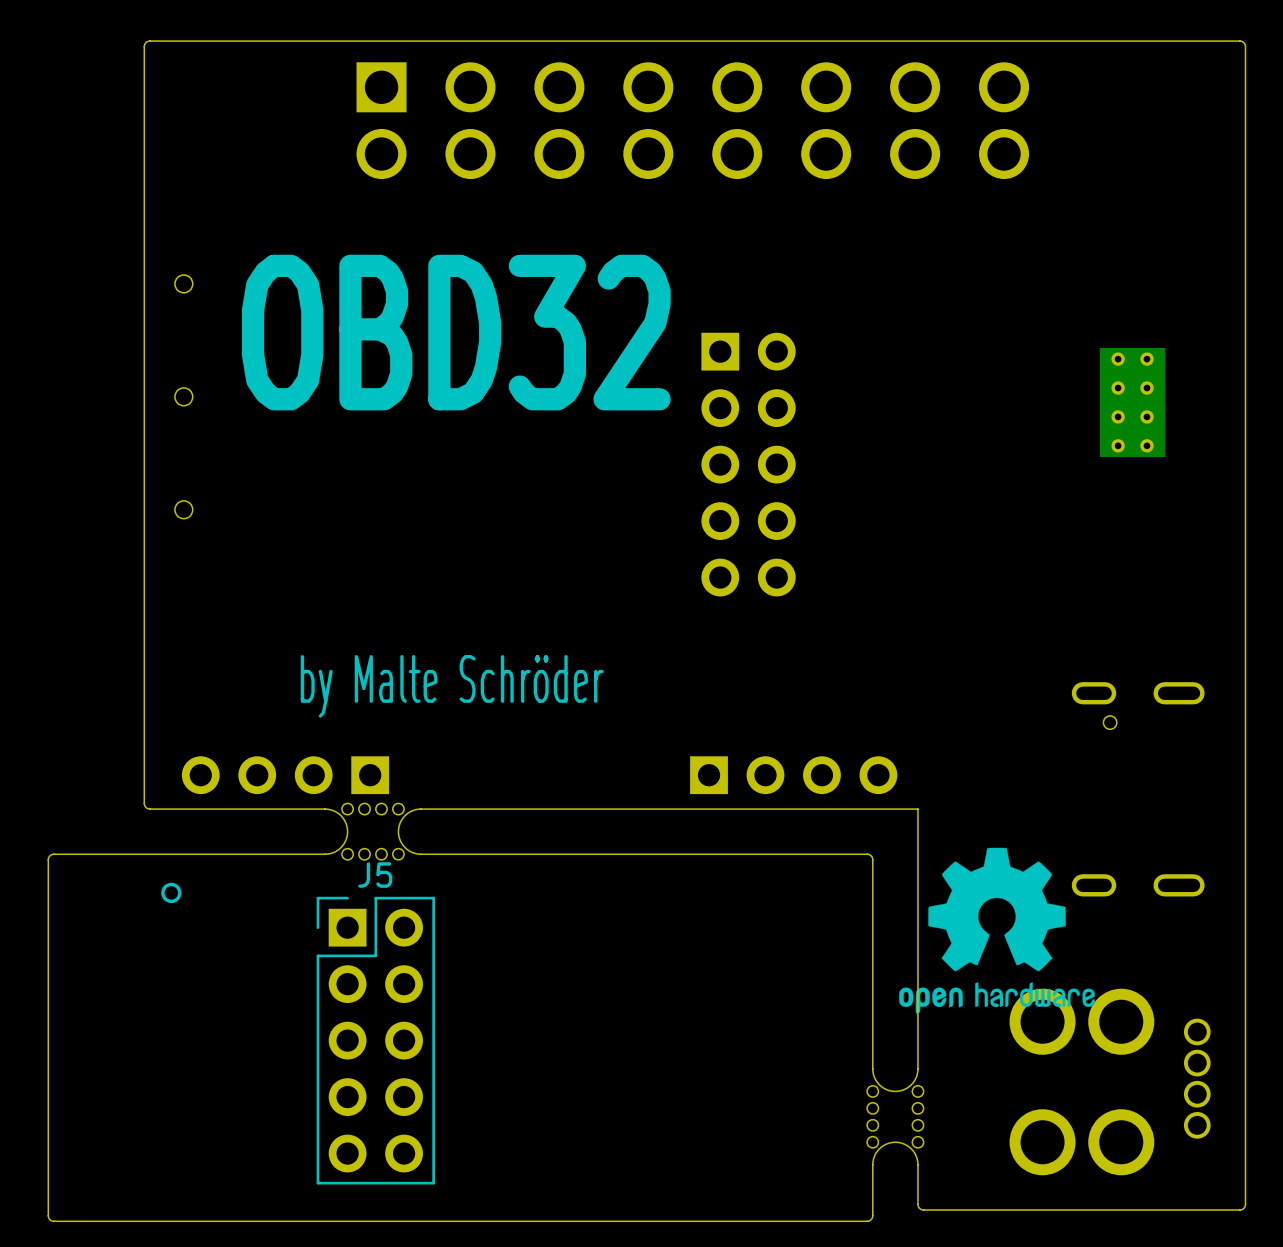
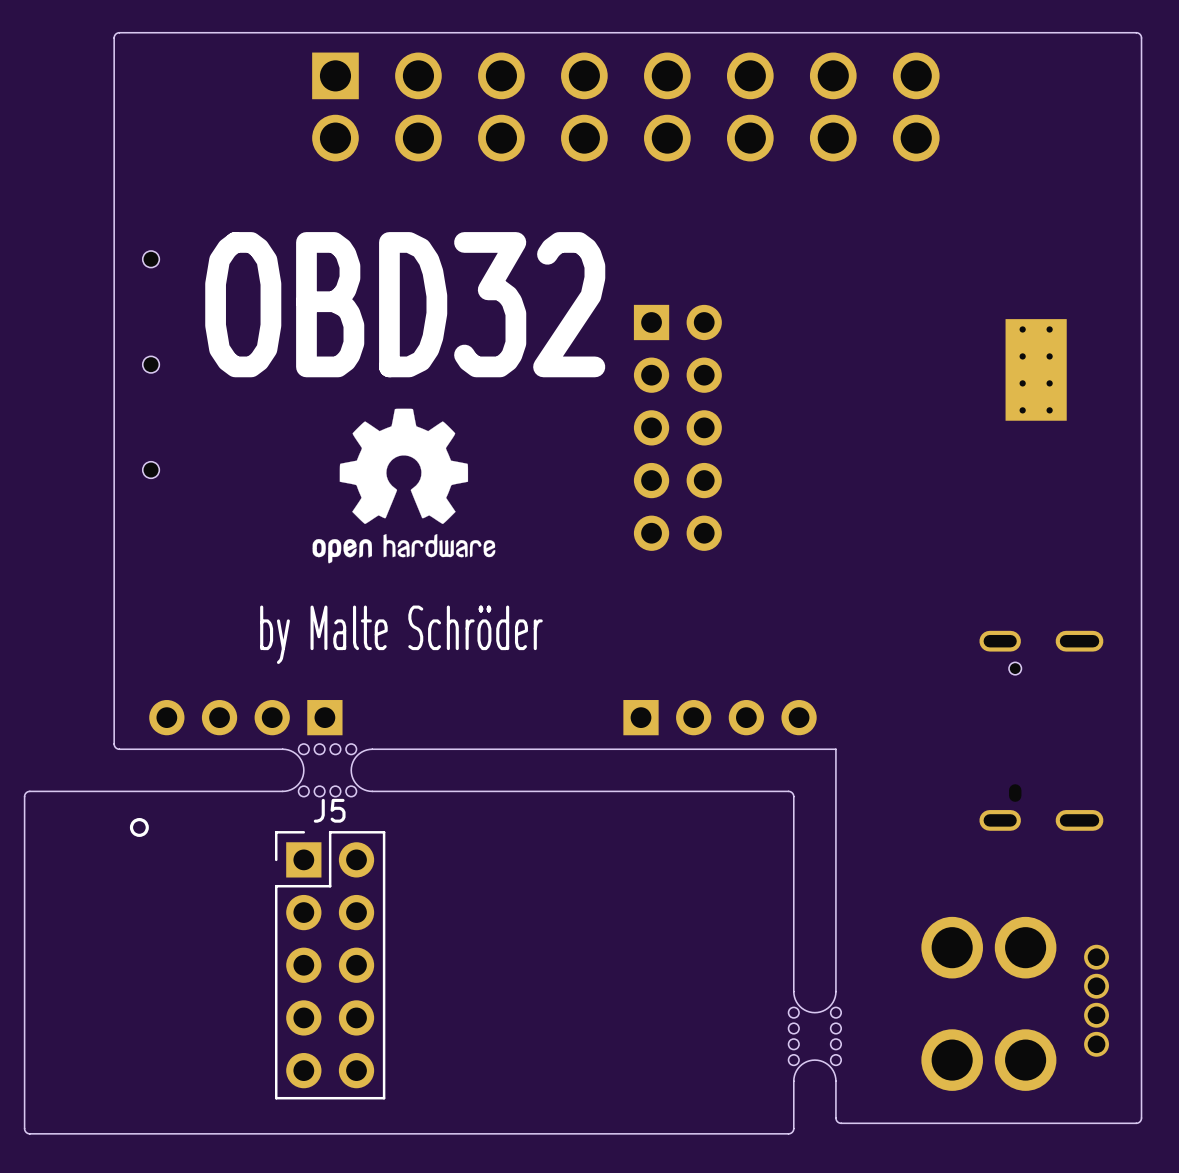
drawing: none -> [312, 408, 496, 564]
part: (997, 930) -> none

